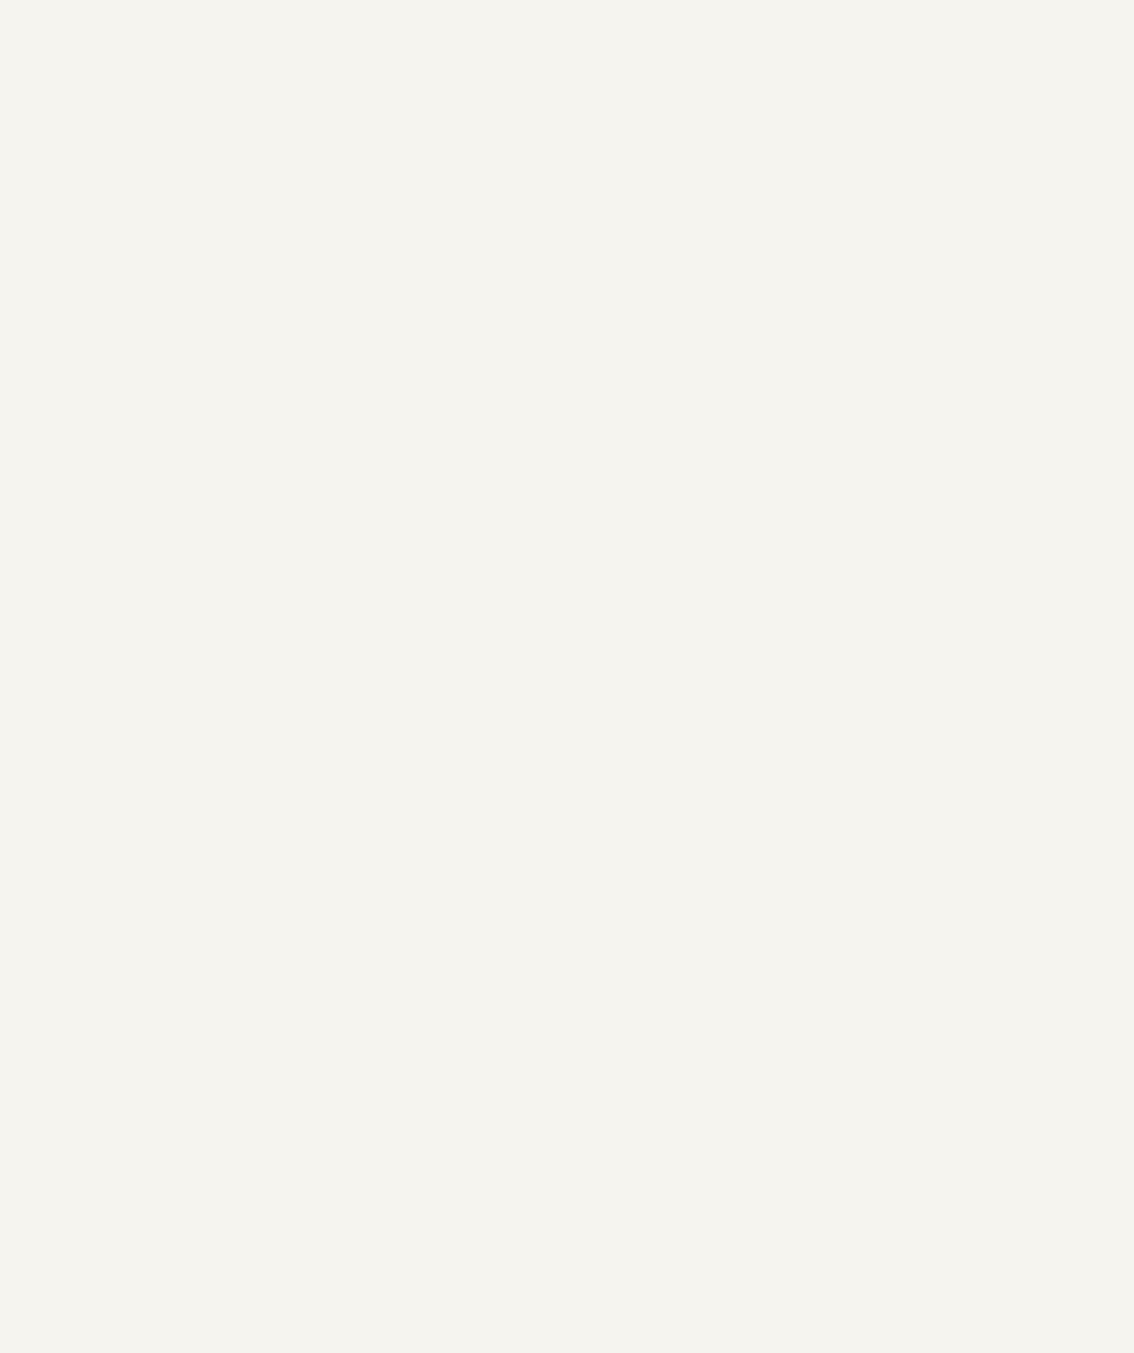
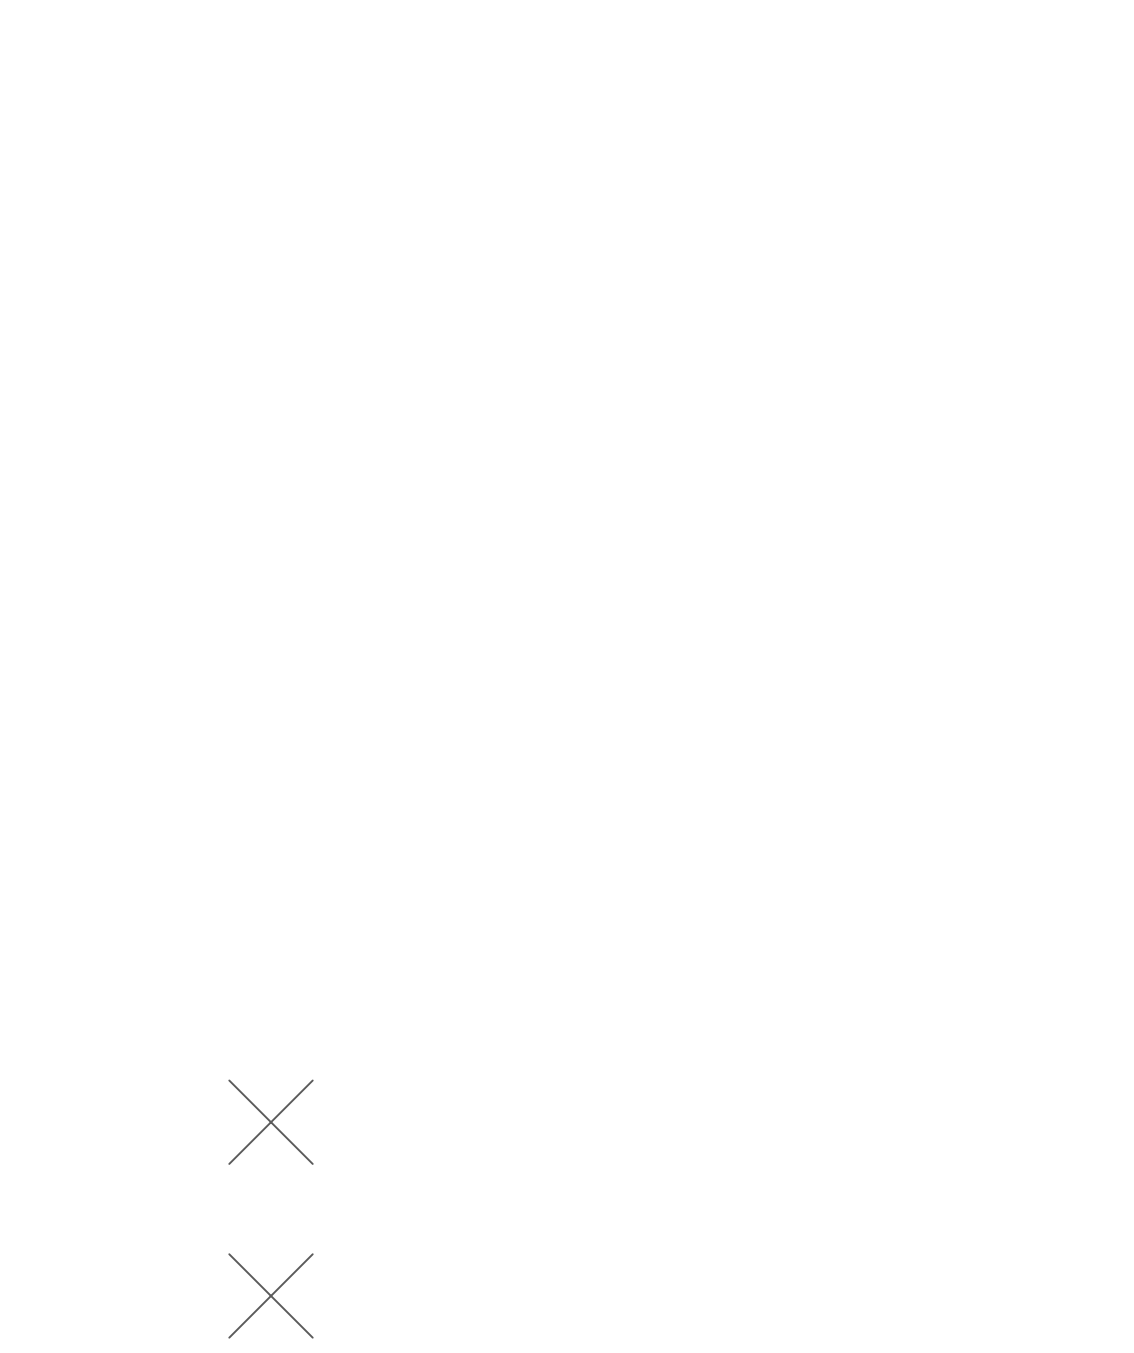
no-connect mark: none -> (271, 1122)
no-connect mark: none -> (271, 1295)

